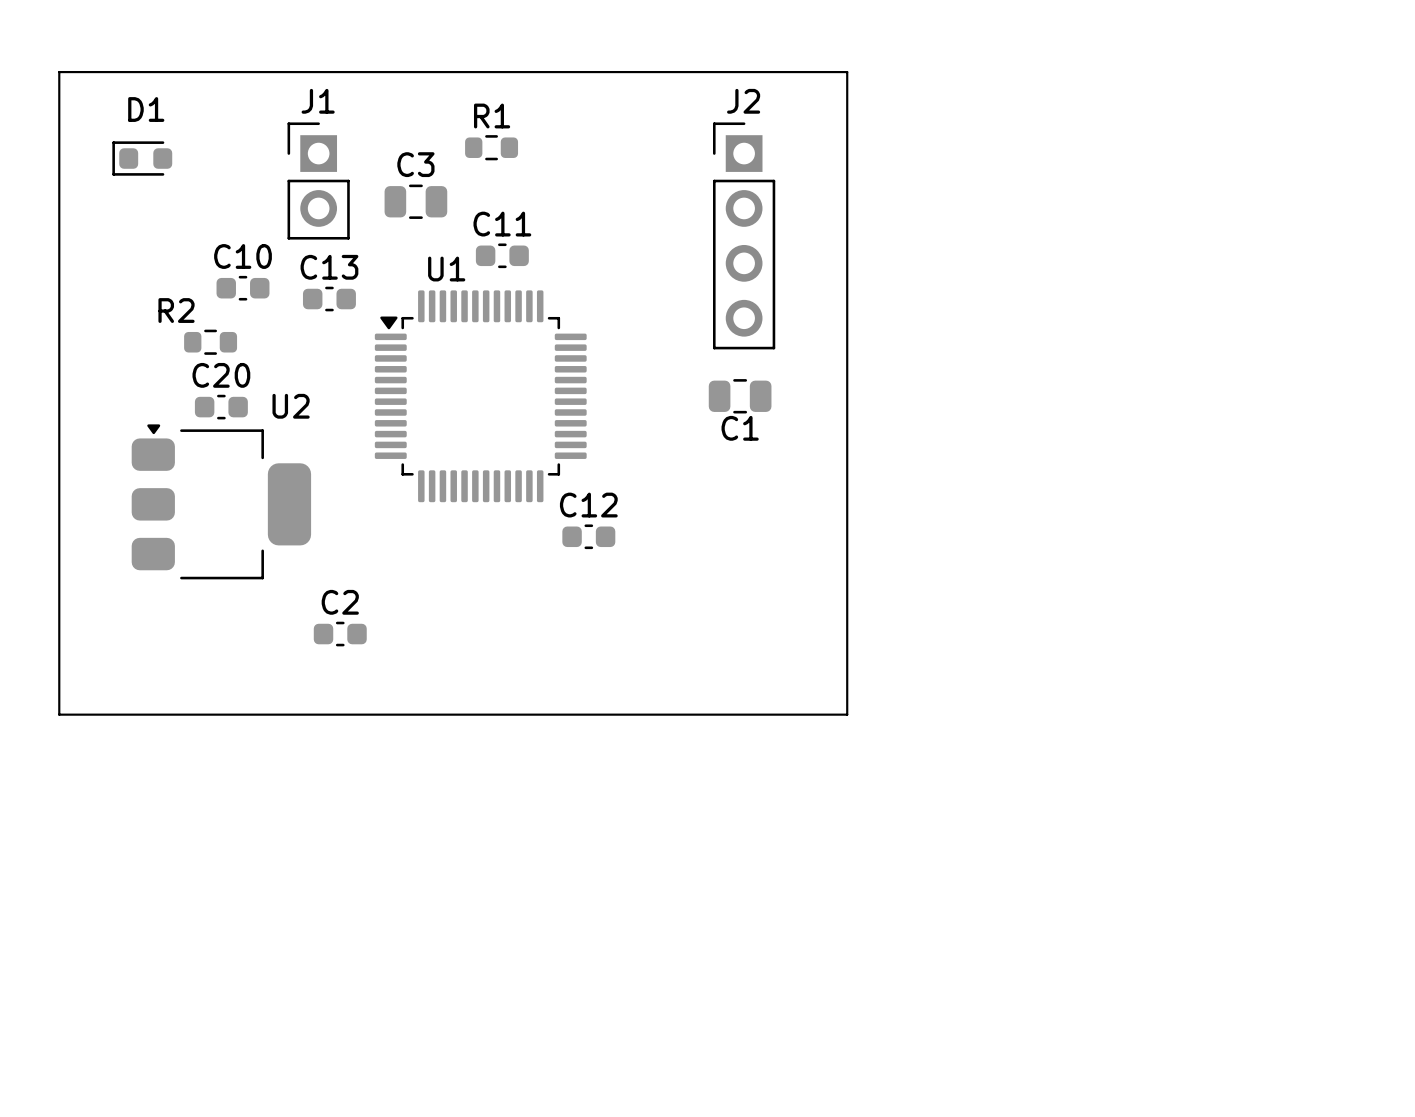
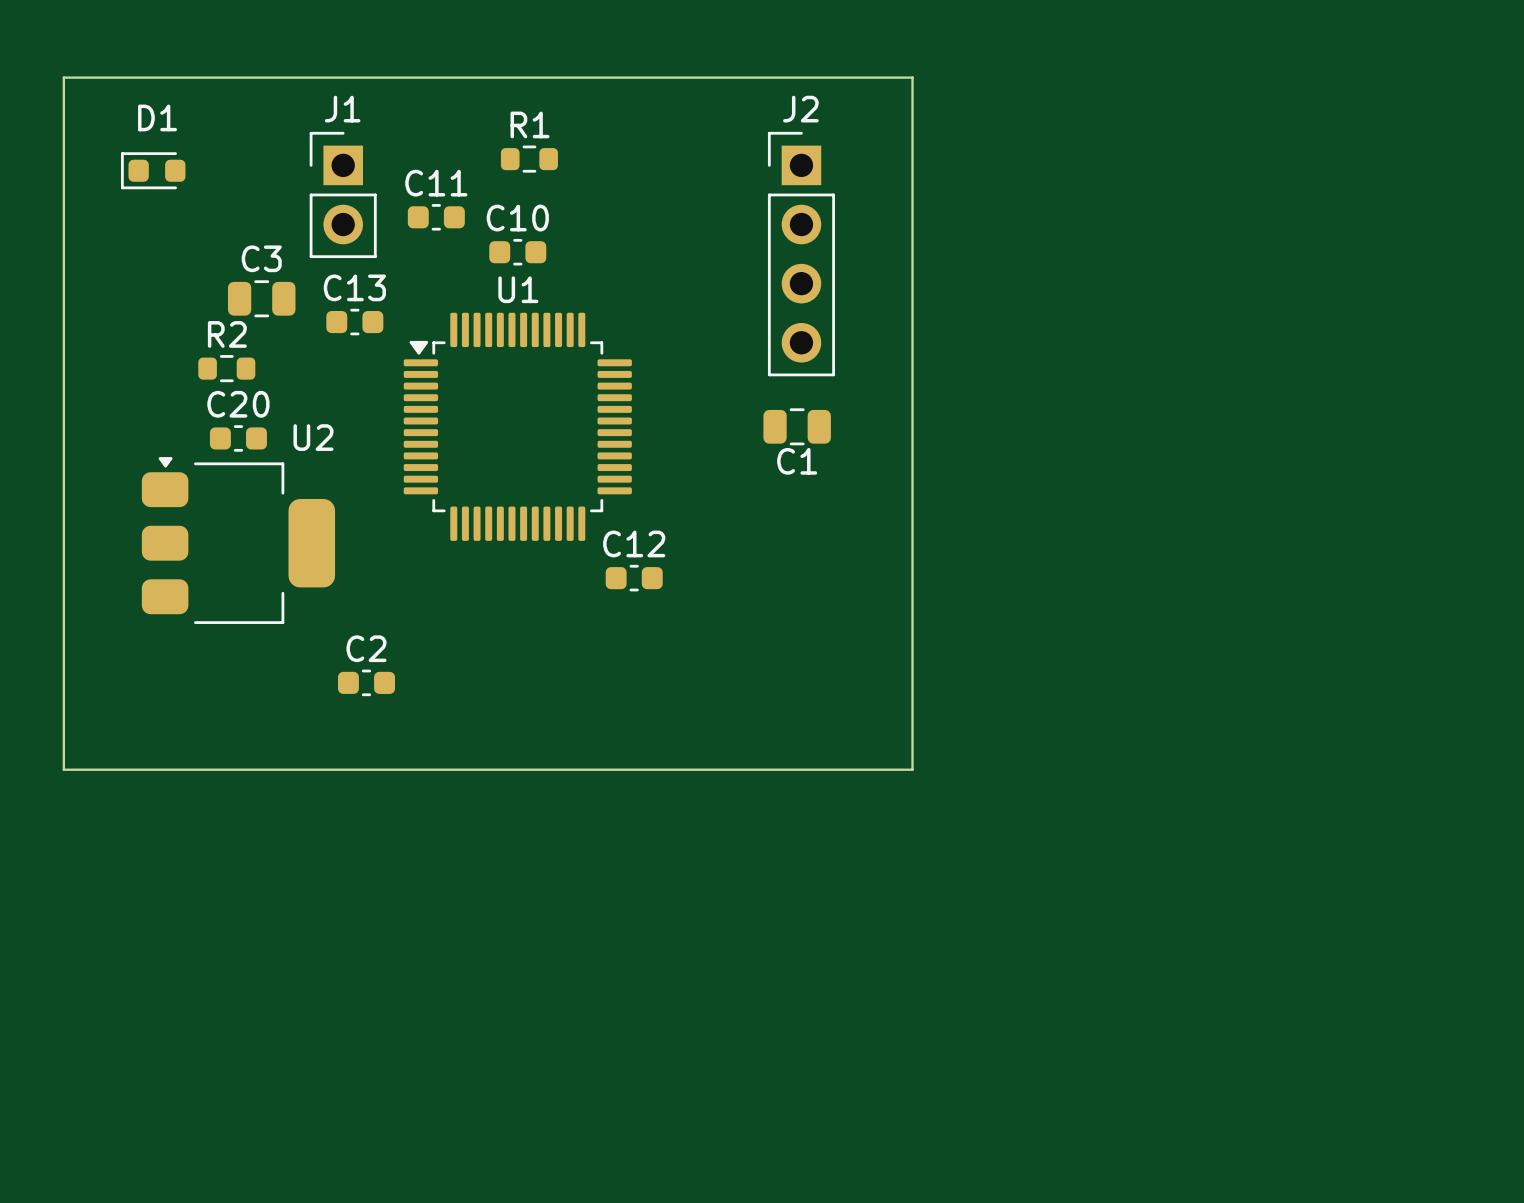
C3 position: (415, 201) -> (261, 298)
C11 position: (502, 255) -> (436, 217)
U1 name position: U1 (446, 269) -> U1 (518, 289)
C10 position: (243, 288) -> (517, 252)
R2 name position: R2 (176, 310) -> R2 (227, 334)

